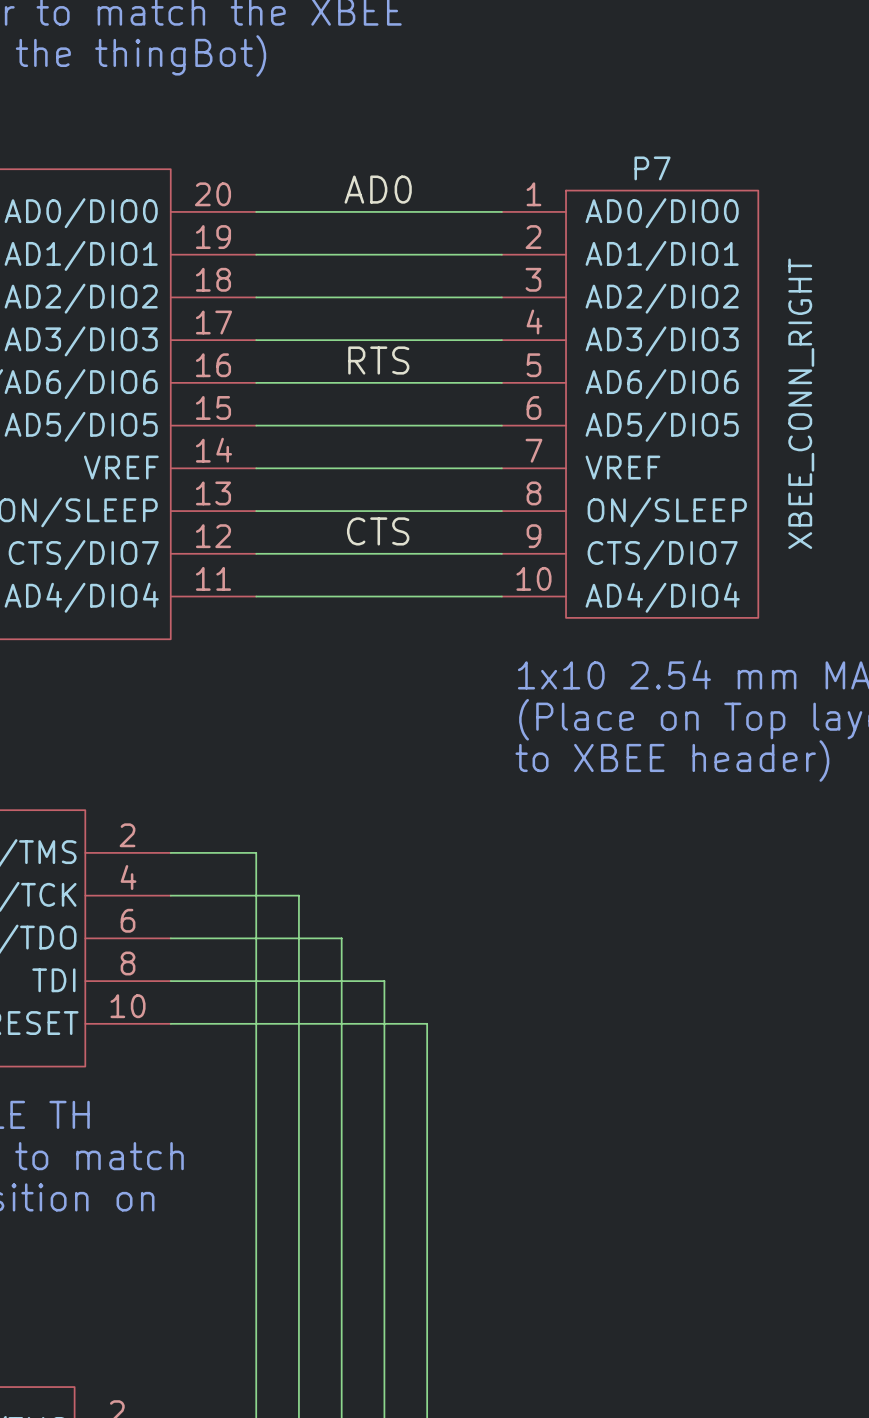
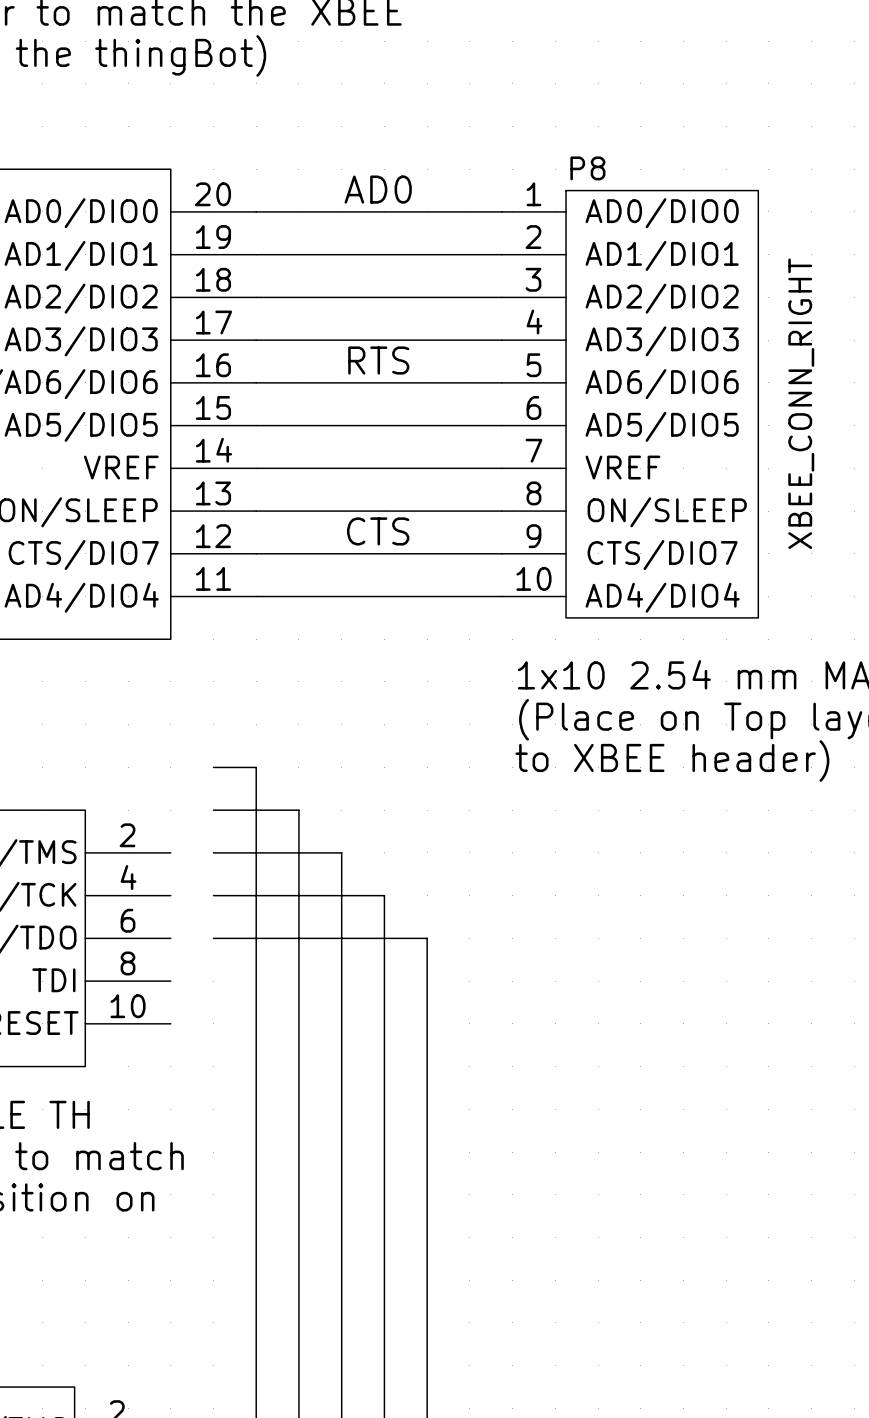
P7 name: P7 (652, 168) -> P8 (587, 168)
wire: (170, 852) (213, 852) -> none
wire: (170, 895) (213, 895) -> none
wire: (170, 938) (213, 938) -> none
wire: (170, 981) (384, 981) -> (213, 810) (298, 810) (298, 895) (384, 895) (384, 981)
wire: (170, 1023) (427, 1023) -> (213, 767) (256, 767) (256, 852) (341, 852) (341, 938) (427, 938) (427, 1023)

